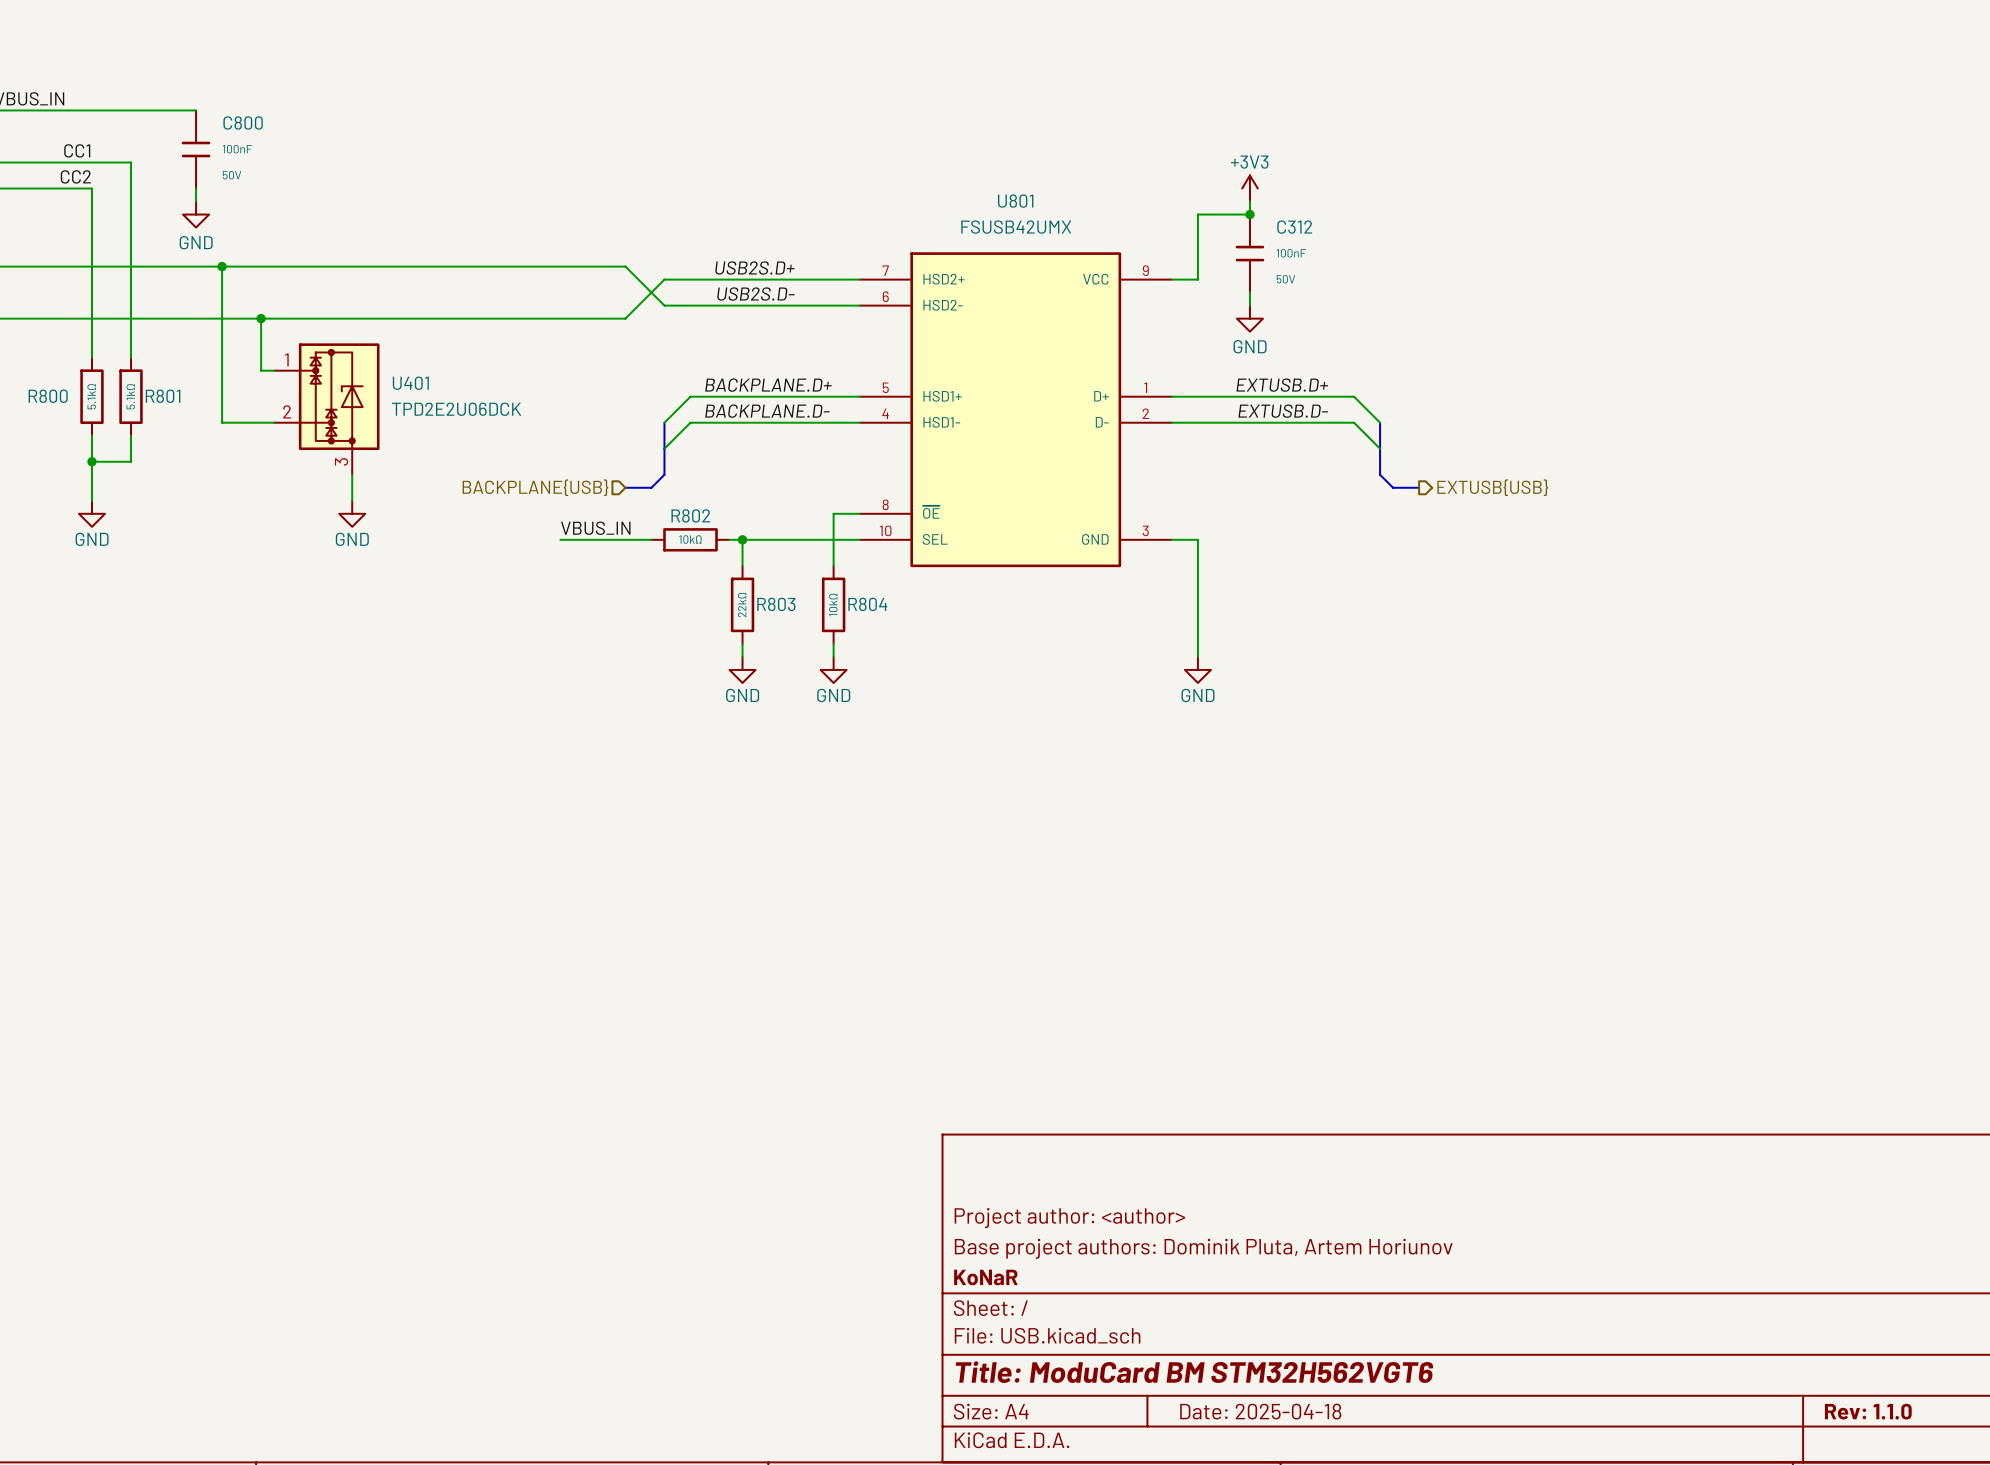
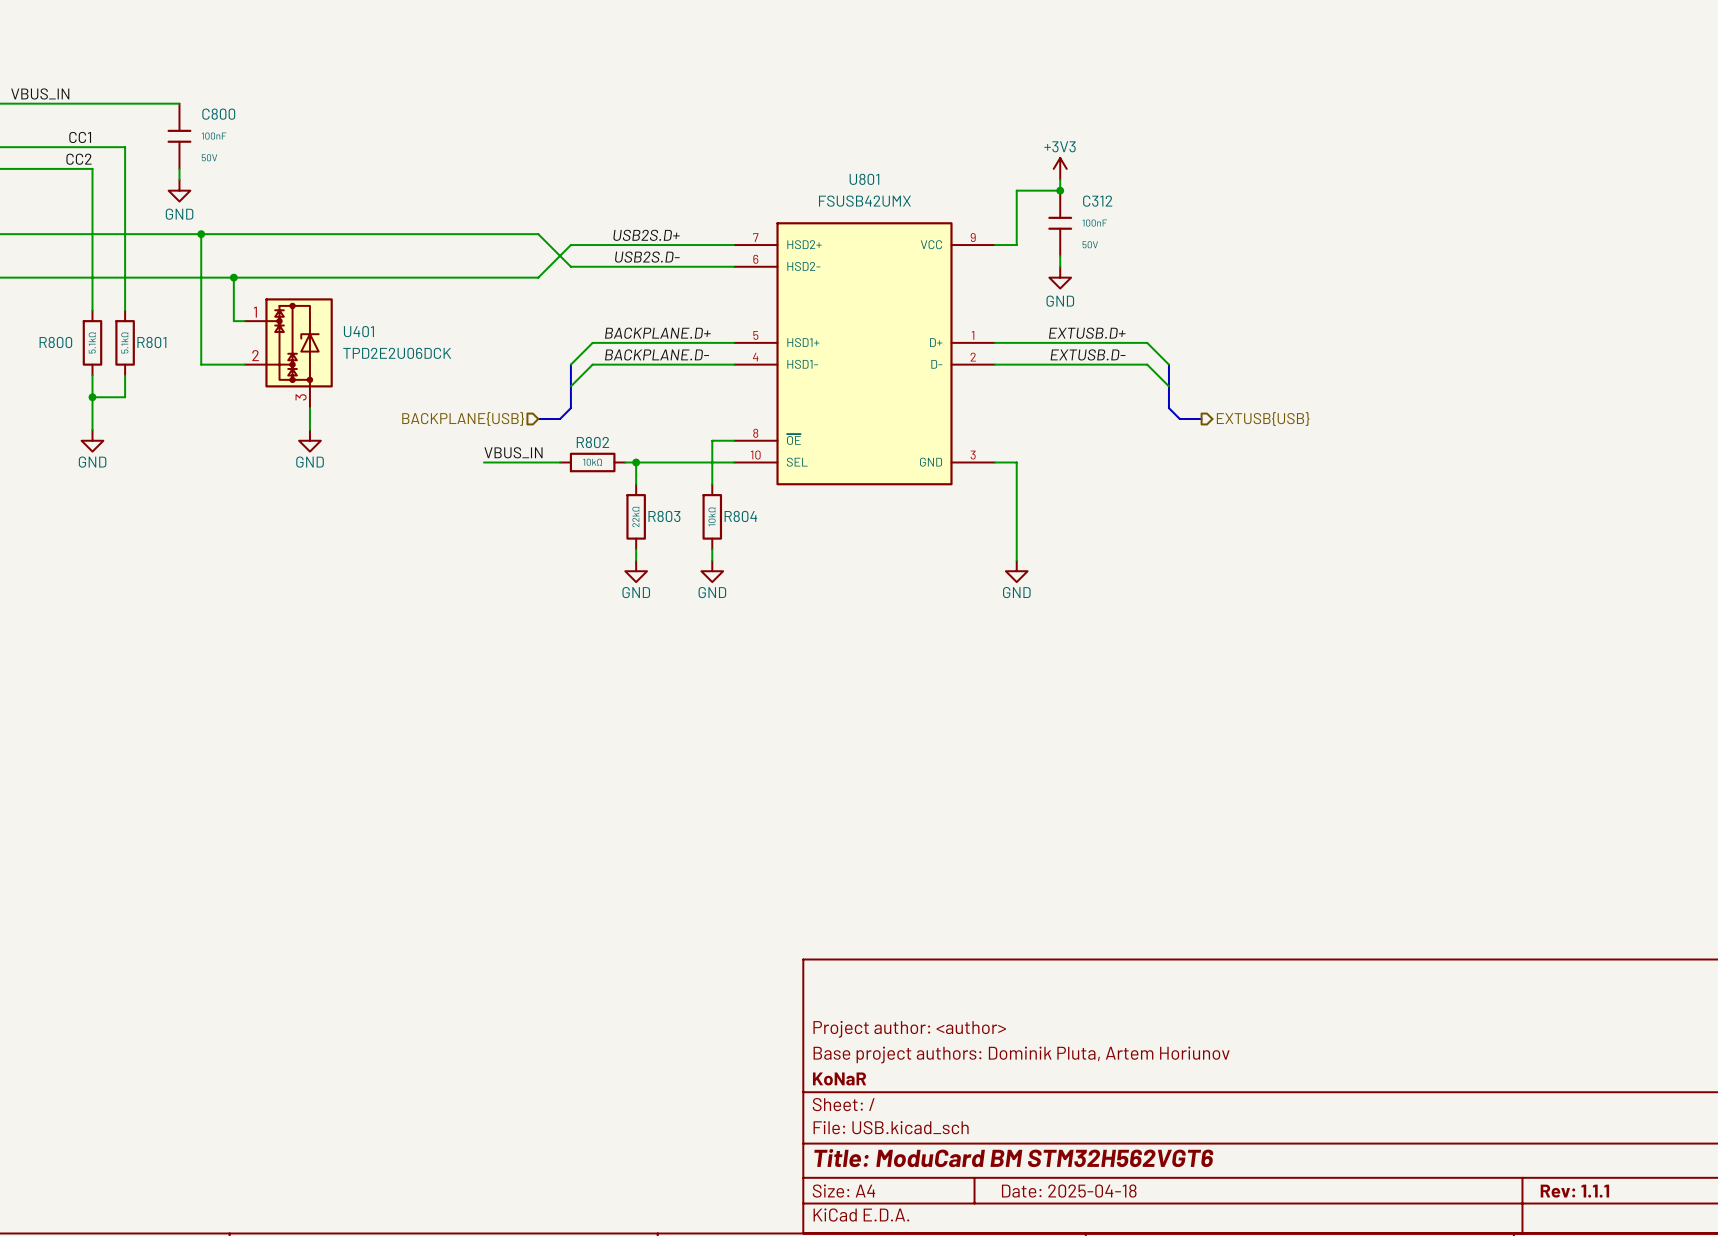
title block: Rev: 1.1.0 (1868, 1411) -> Rev: 1.1.1 (1574, 1191)

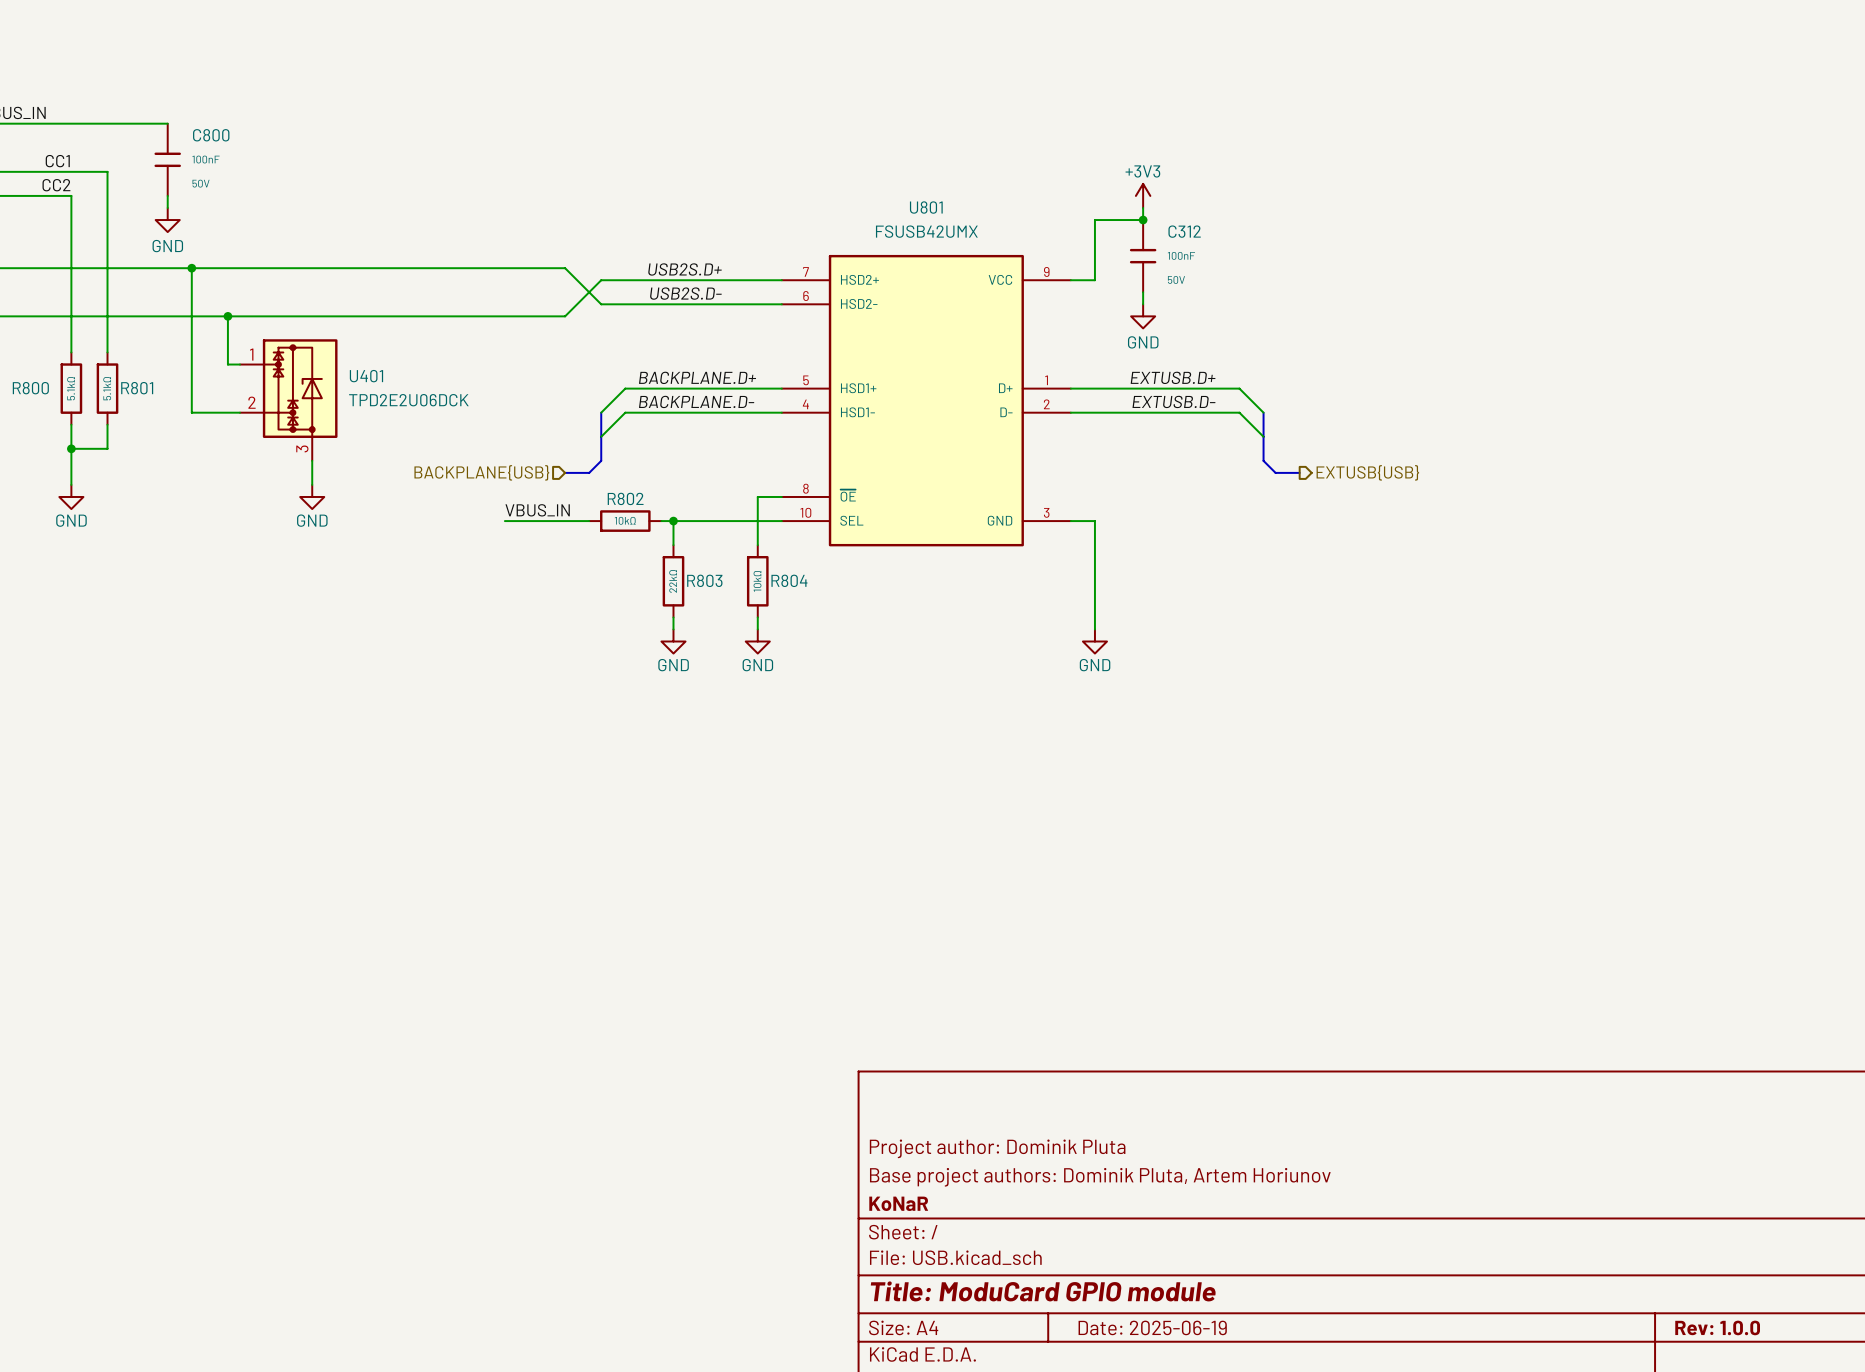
title block: Project author: <author> (909, 1029) -> Project author: Dominik Pluta (997, 1148)
title block: Title: ModuCard BM STM32H562VGT6 (1013, 1158) -> Title: ModuCard GPIO module (1043, 1291)
title block: Date: 2025-04-18 (1069, 1191) -> Date: 2025-06-19 (1152, 1327)
title block: Rev: 1.1.1 (1574, 1191) -> Rev: 1.0.0 (1717, 1327)

